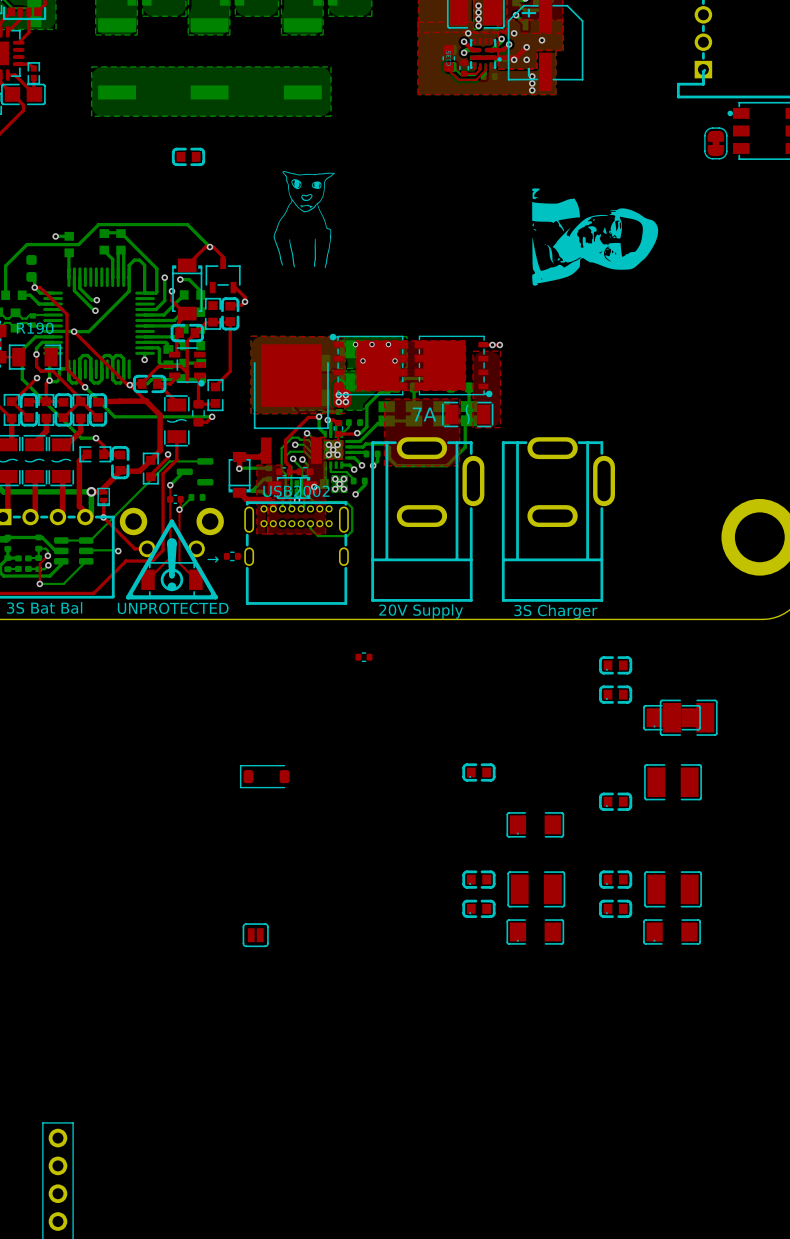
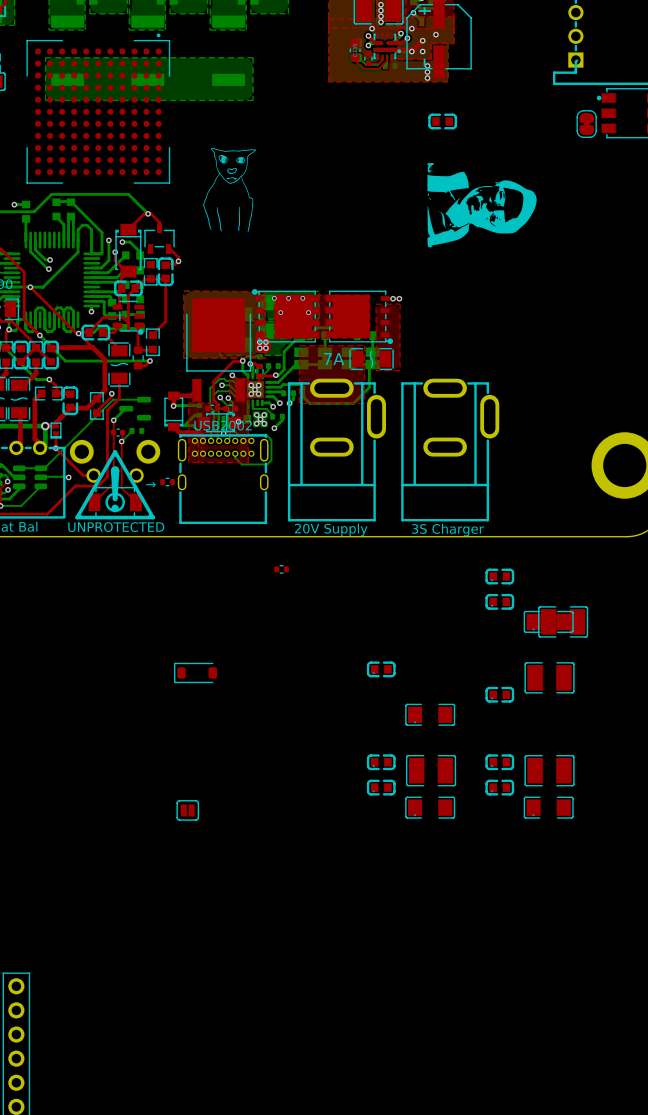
part: none -> (98, 108)
part: none -> (442, 121)
part: (188, 156) -> none

